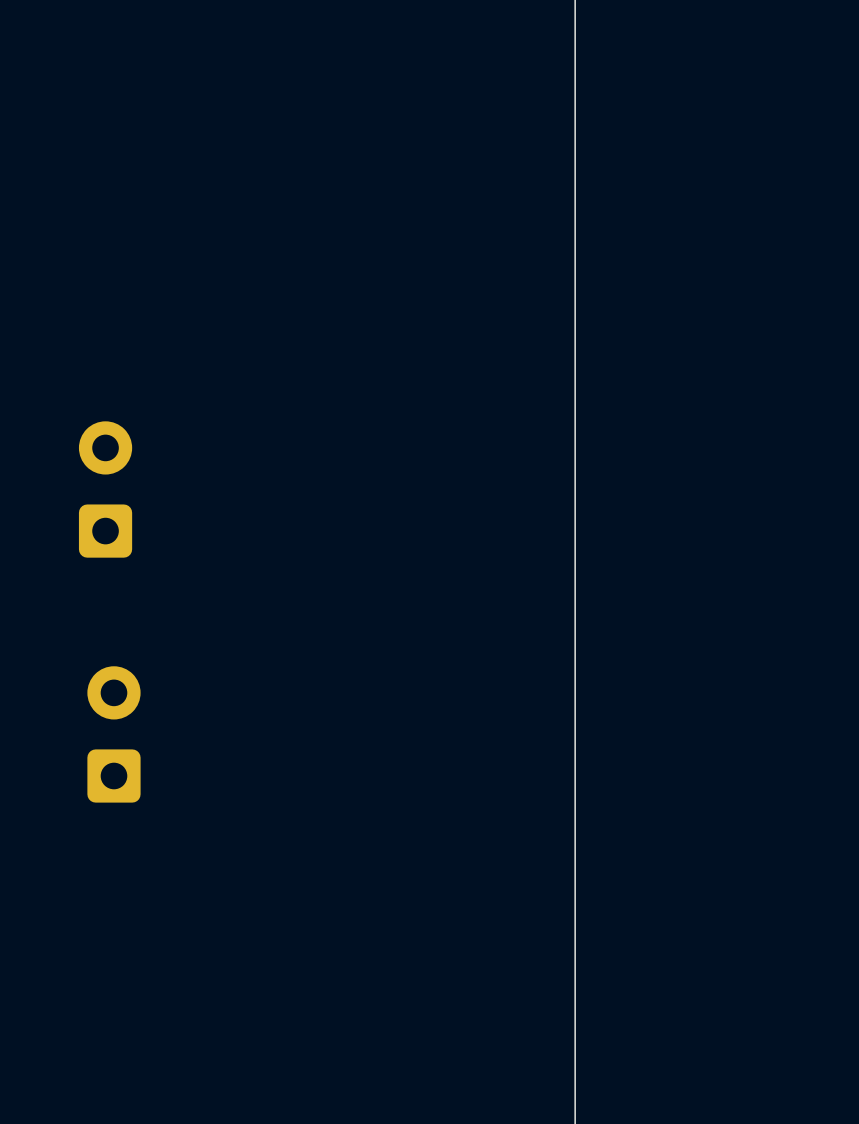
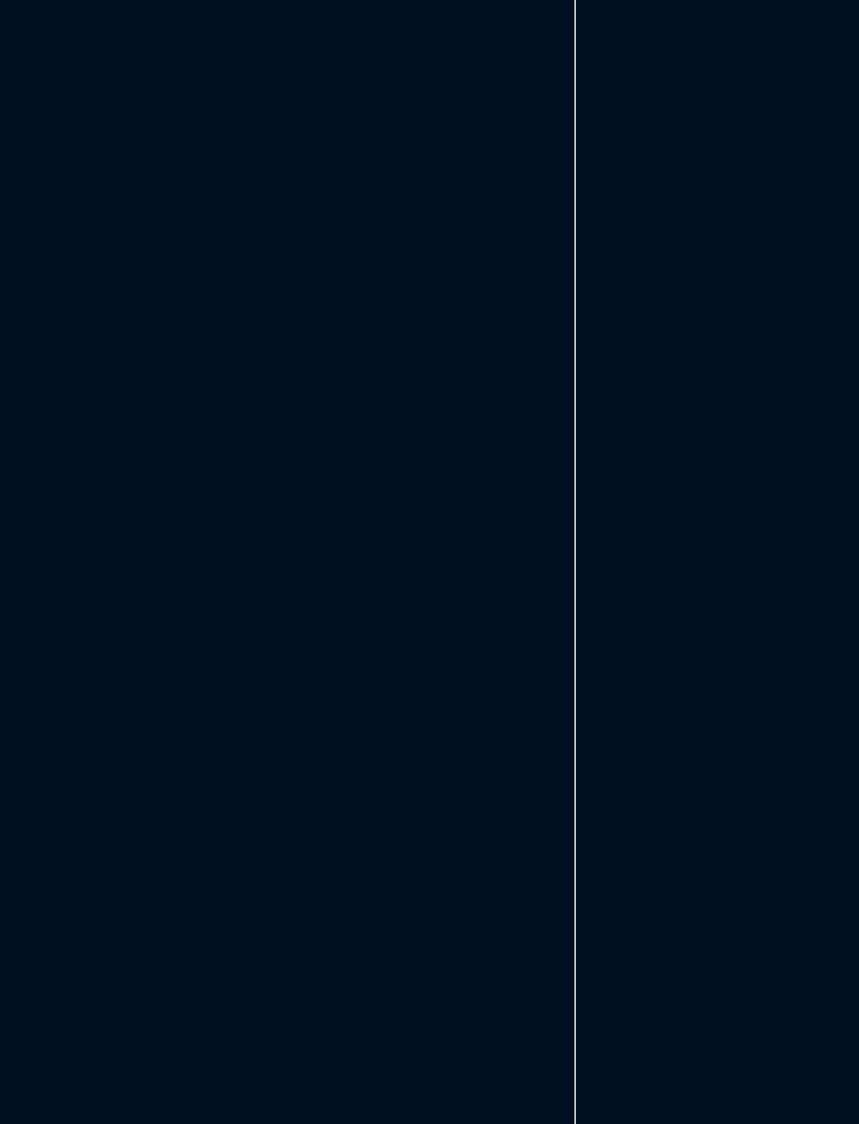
part: (105, 489) -> none
part: (113, 734) -> none

